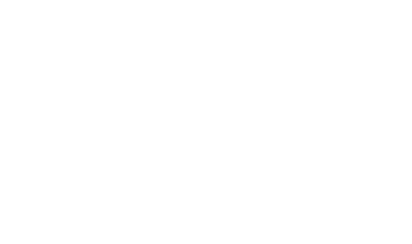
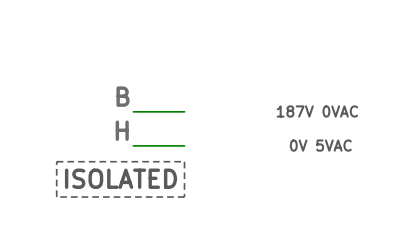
label: none -> B (123, 96)
wire: none -> (133, 111) (184, 111)
text: none -> 187V 0VAC (317, 111)
label: none -> H (122, 130)
wire: none -> (133, 145) (184, 145)
text: none -> 0V 5VAC (320, 145)
line: none -> (56, 161) (184, 161) (184, 197) (56, 197) (56, 161)
text: none -> ISOLATED (121, 178)

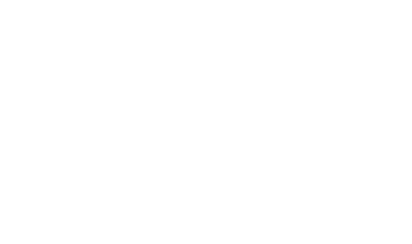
label: B (123, 96) -> none
wire: (133, 111) (184, 111) -> none
text: 187V 0VAC (317, 111) -> none
label: H (122, 130) -> none
wire: (133, 145) (184, 145) -> none
text: 0V 5VAC (320, 145) -> none
line: (56, 161) (184, 161) (184, 197) (56, 197) (56, 161) -> none
text: ISOLATED (121, 178) -> none

